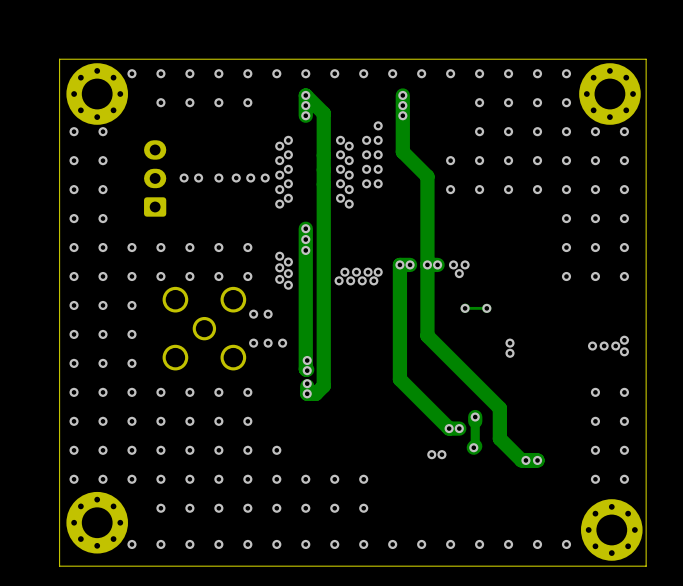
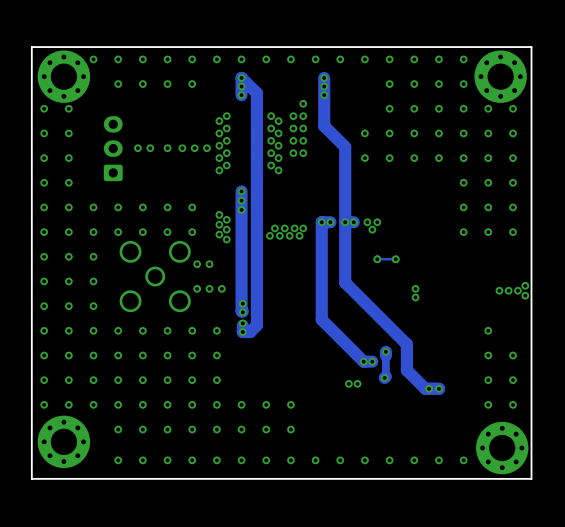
via: none -> (525, 285)
via: (624, 340) -> none
via: none -> (499, 290)
via: none -> (508, 290)
via: none -> (517, 290)
via: (592, 346) -> none
via: (604, 346) -> none
via: (615, 346) -> none
via: (624, 351) -> none
via: none -> (525, 295)
via: none -> (216, 330)
via: (624, 392) -> none
via: none -> (216, 355)
via: (131, 544) -> none

